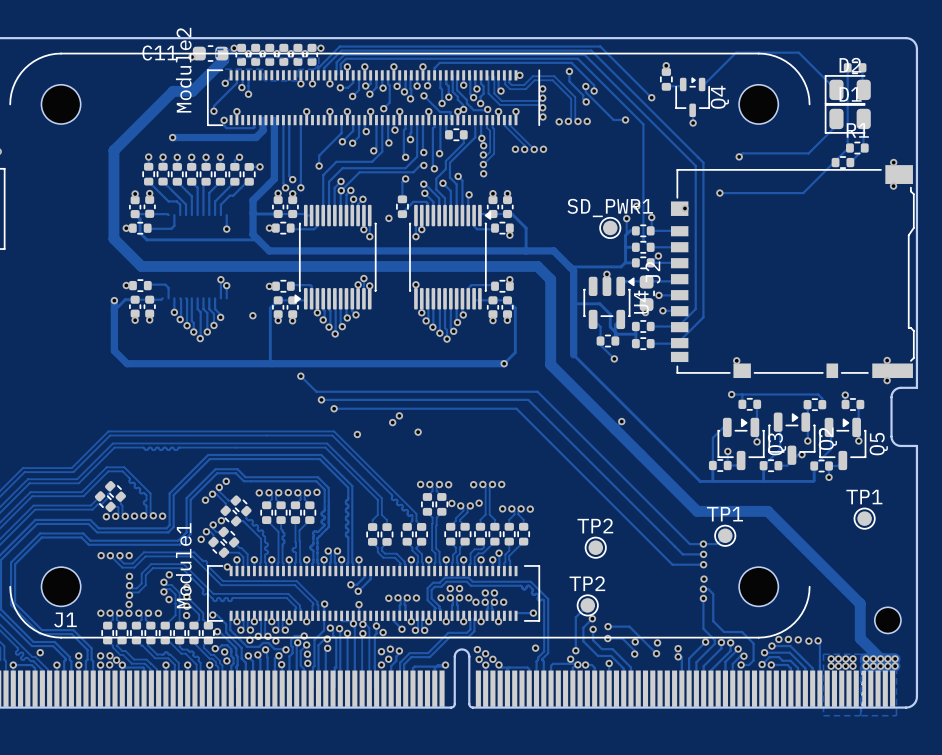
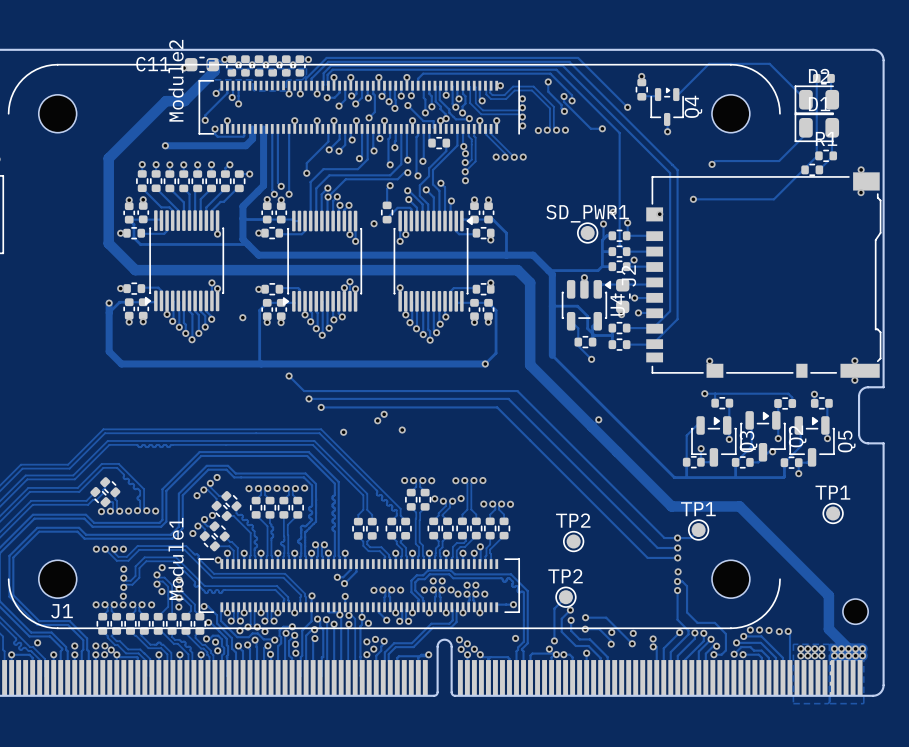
part: none -> (184, 260)

